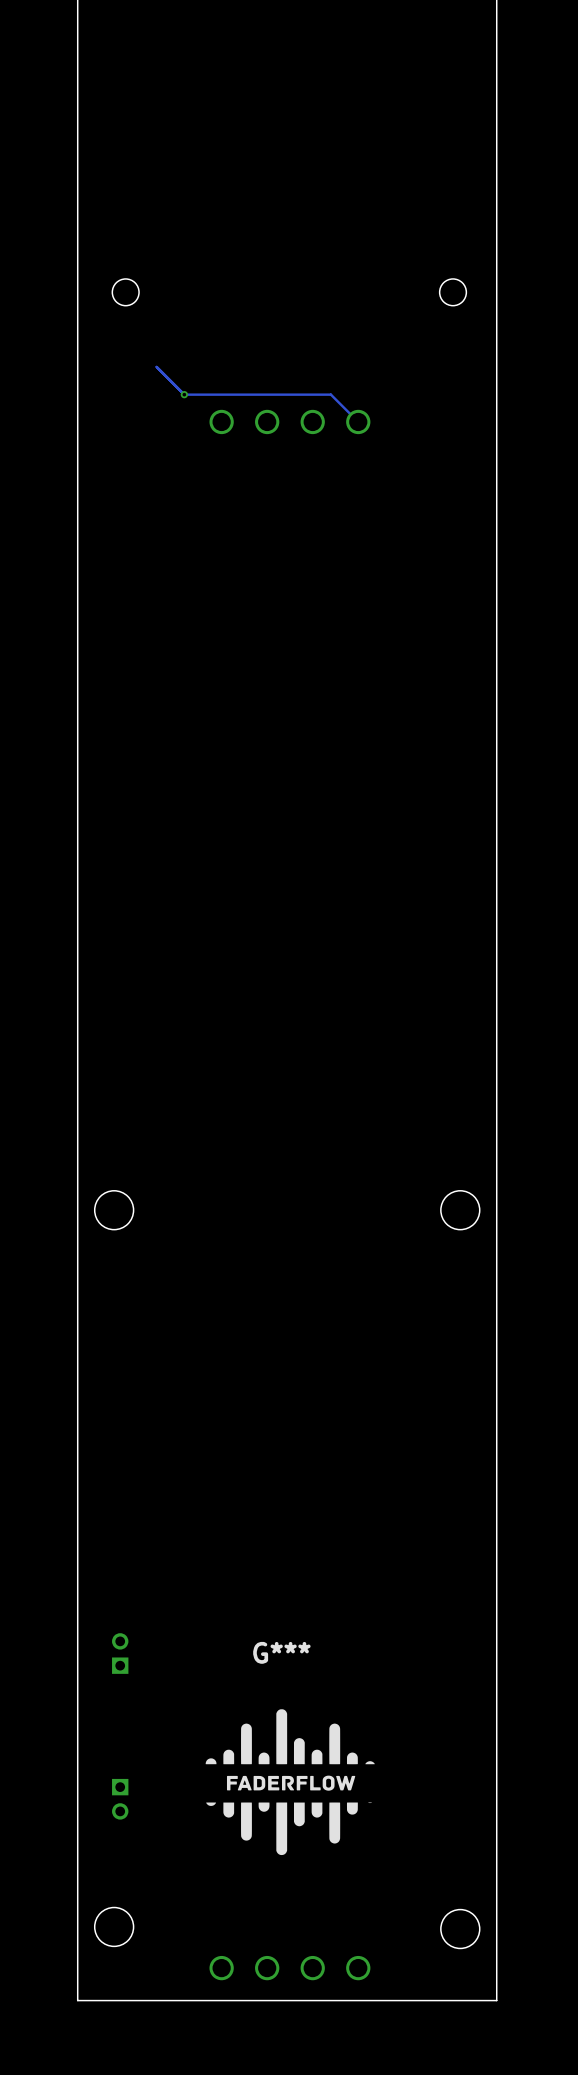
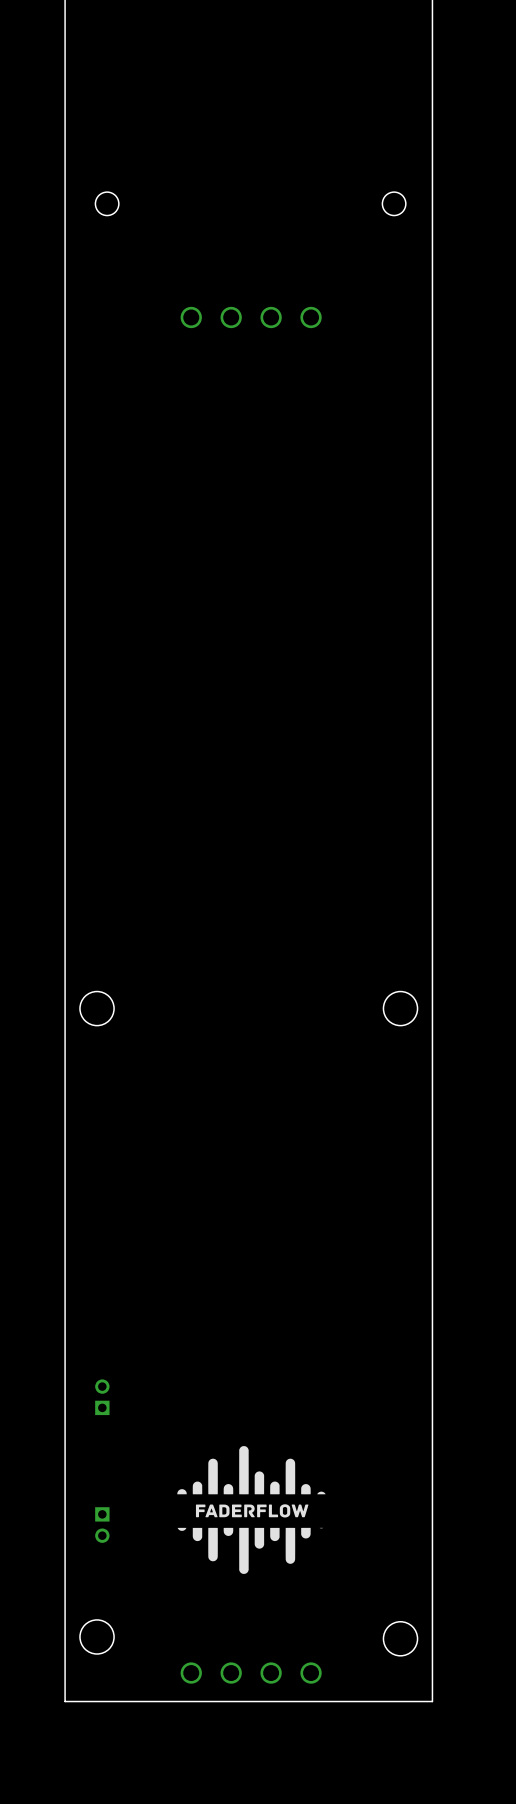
track: (156, 366) (184, 394) (330, 394) (358, 421) -> none
via: (184, 394) -> none
G***: (290, 1782) -> none

